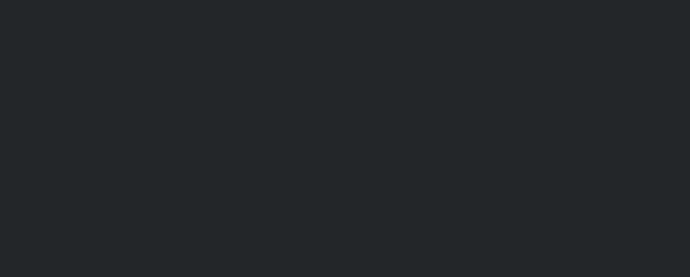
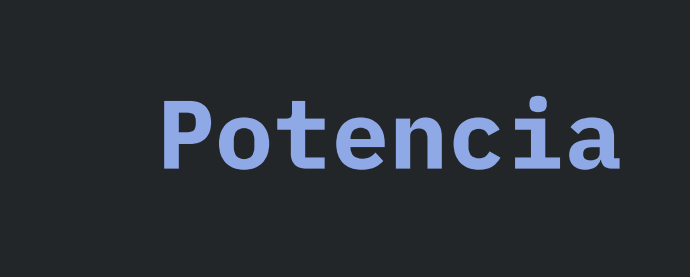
text: none -> Potencia (391, 132)

